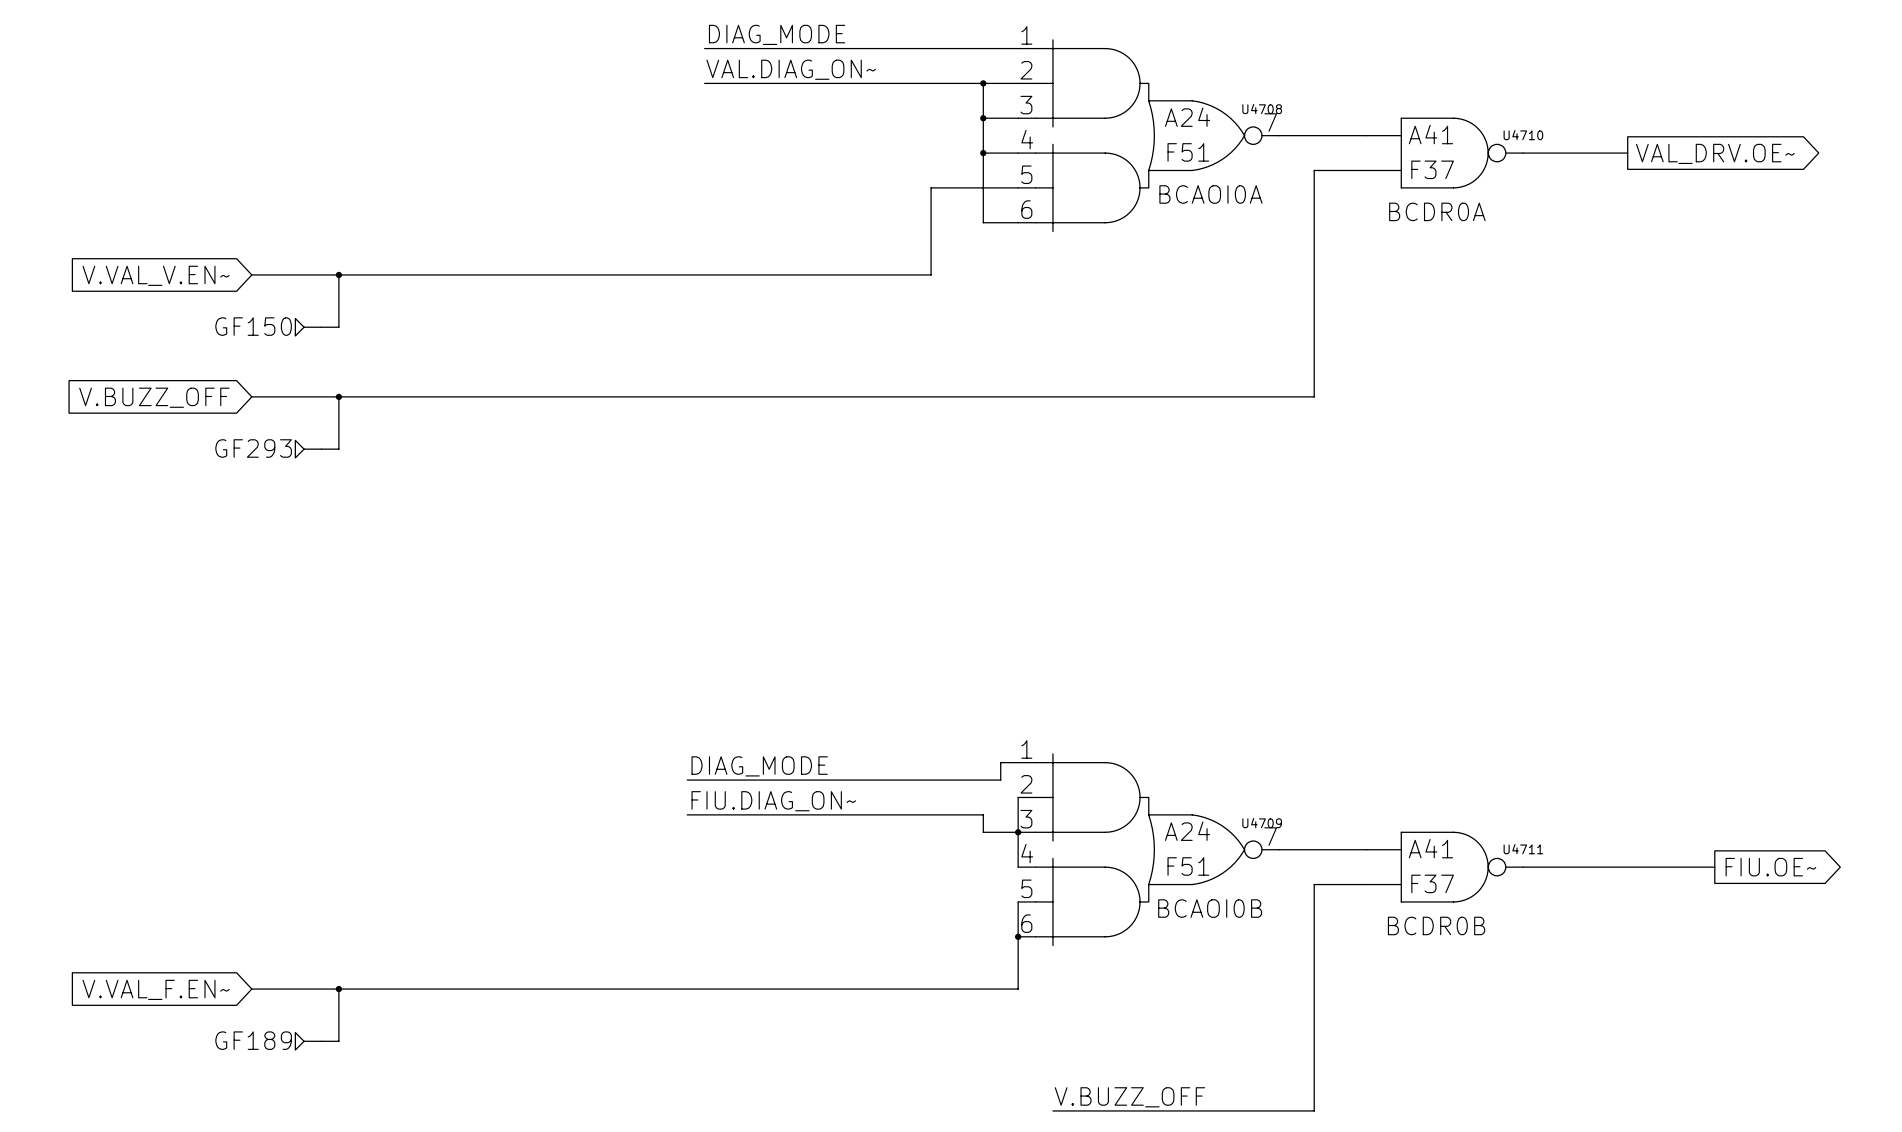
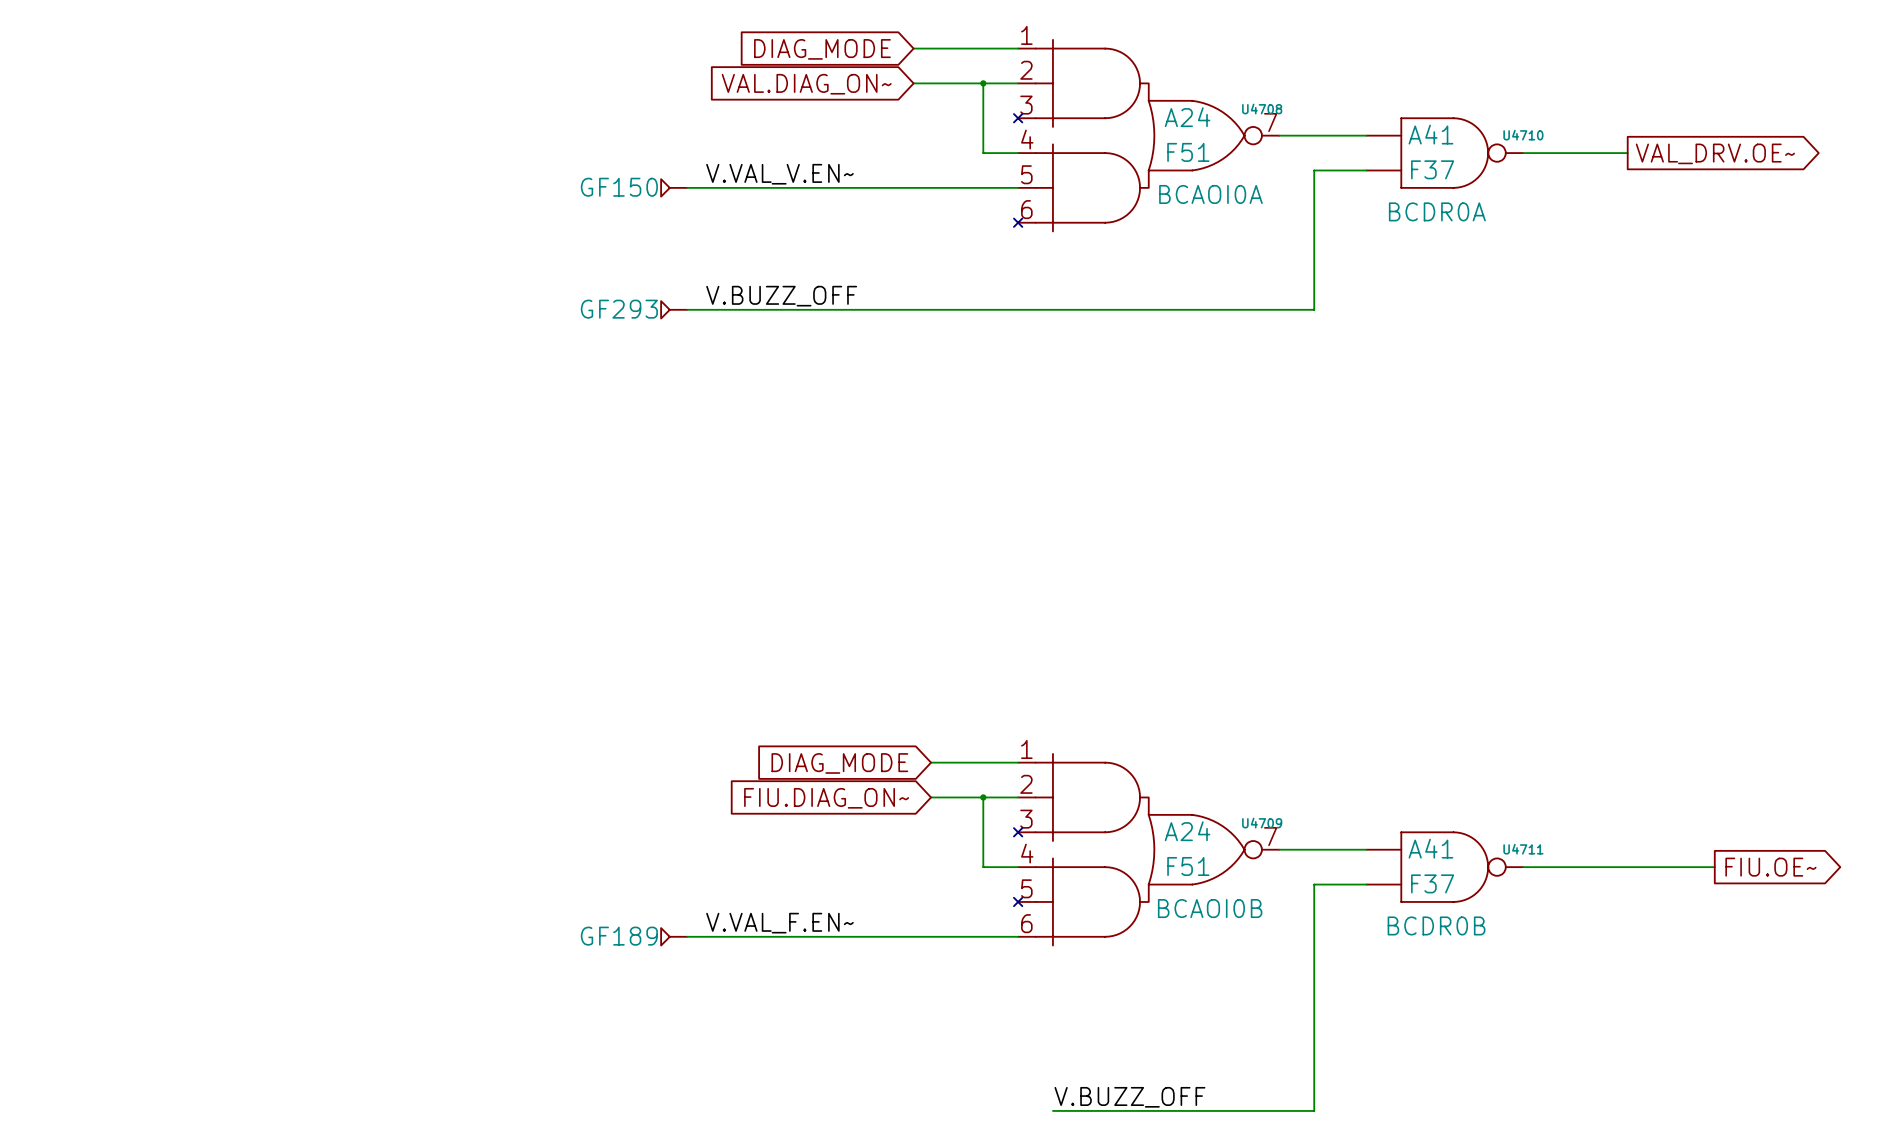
label: DIAG_MODE (777, 34) -> none
wire: (704, 48) (913, 48) -> none
global label: none -> DIAG_MODE (822, 49)
label: VAL.DIAG_ON~ (791, 69) -> none
wire: (704, 83) (913, 83) -> none
global label: none -> VAL.DIAG_ON~ (806, 84)
wire: (983, 118) (1018, 118) -> none
junction: (983, 118) -> none
no-connect mark: none -> (1018, 118)
wire: (983, 153) (983, 222) (1018, 222) -> none
junction: (983, 153) -> none
label: none -> V.VAL_V.EN~ (779, 174)
wire: (931, 187) (931, 274) (251, 274) -> (931, 187) (687, 187)
no-connect mark: none -> (1018, 222)
wire: (338, 274) (338, 327) (321, 327) -> none
junction: (338, 274) -> none
global label: V.VAL_V.EN~ (156, 275) -> none
label: none -> V.BUZZ_OFF (781, 296)
wire: (1314, 309) (1314, 396) (251, 396) -> (1314, 309) (687, 309)
GF150 position: (308, 327) -> (673, 187)
wire: (338, 396) (338, 449) (321, 449) -> none
junction: (338, 396) -> none
global label: V.BUZZ_OFF (154, 397) -> none
GF293 position: (308, 449) -> (673, 309)
wire: (1000, 762) (1000, 780) (687, 780) -> (1000, 762) (931, 762)
global label: none -> DIAG_MODE (839, 763)
label: DIAG_MODE (759, 766) -> none
junction: none -> (983, 797)
wire: (1018, 797) (1018, 867) -> (1018, 797) (931, 797)
global label: none -> FIU.DIAG_ON~ (826, 798)
label: FIU.DIAG_ON~ (773, 801) -> none
wire: (687, 814) (983, 814) -> (983, 797) (983, 814)
wire: (983, 832) (1018, 832) -> (983, 832) (983, 867) (1018, 867)
junction: (1018, 832) -> none
no-connect mark: none -> (1018, 832)
wire: (1018, 901) (1018, 989) (251, 989) -> none
no-connect mark: none -> (1018, 901)
label: none -> V.VAL_F.EN~ (779, 923)
wire: none -> (687, 936) (1018, 936)
junction: (1018, 936) -> none
global label: V.VAL_F.EN~ (156, 989) -> none
wire: (338, 989) (338, 1041) (321, 1041) -> none
junction: (338, 989) -> none
GF189 position: (308, 1041) -> (673, 936)

